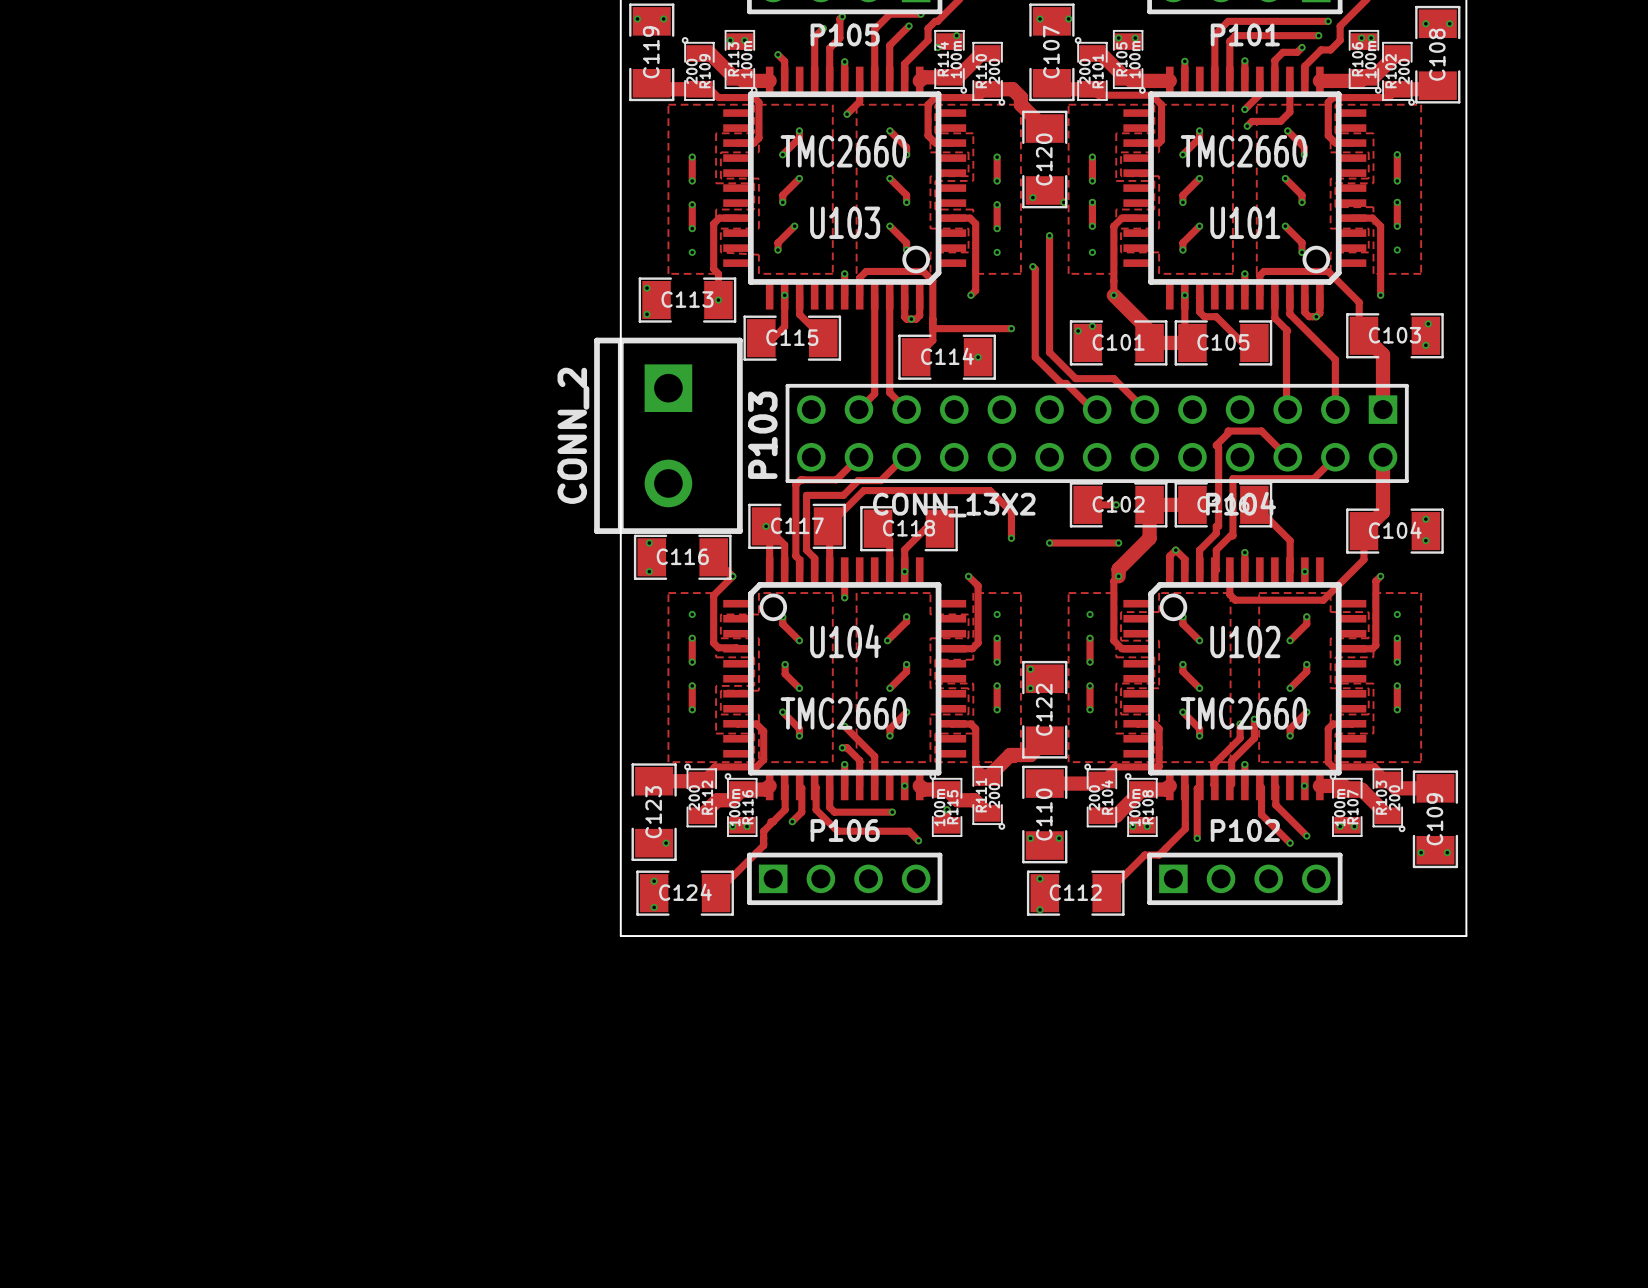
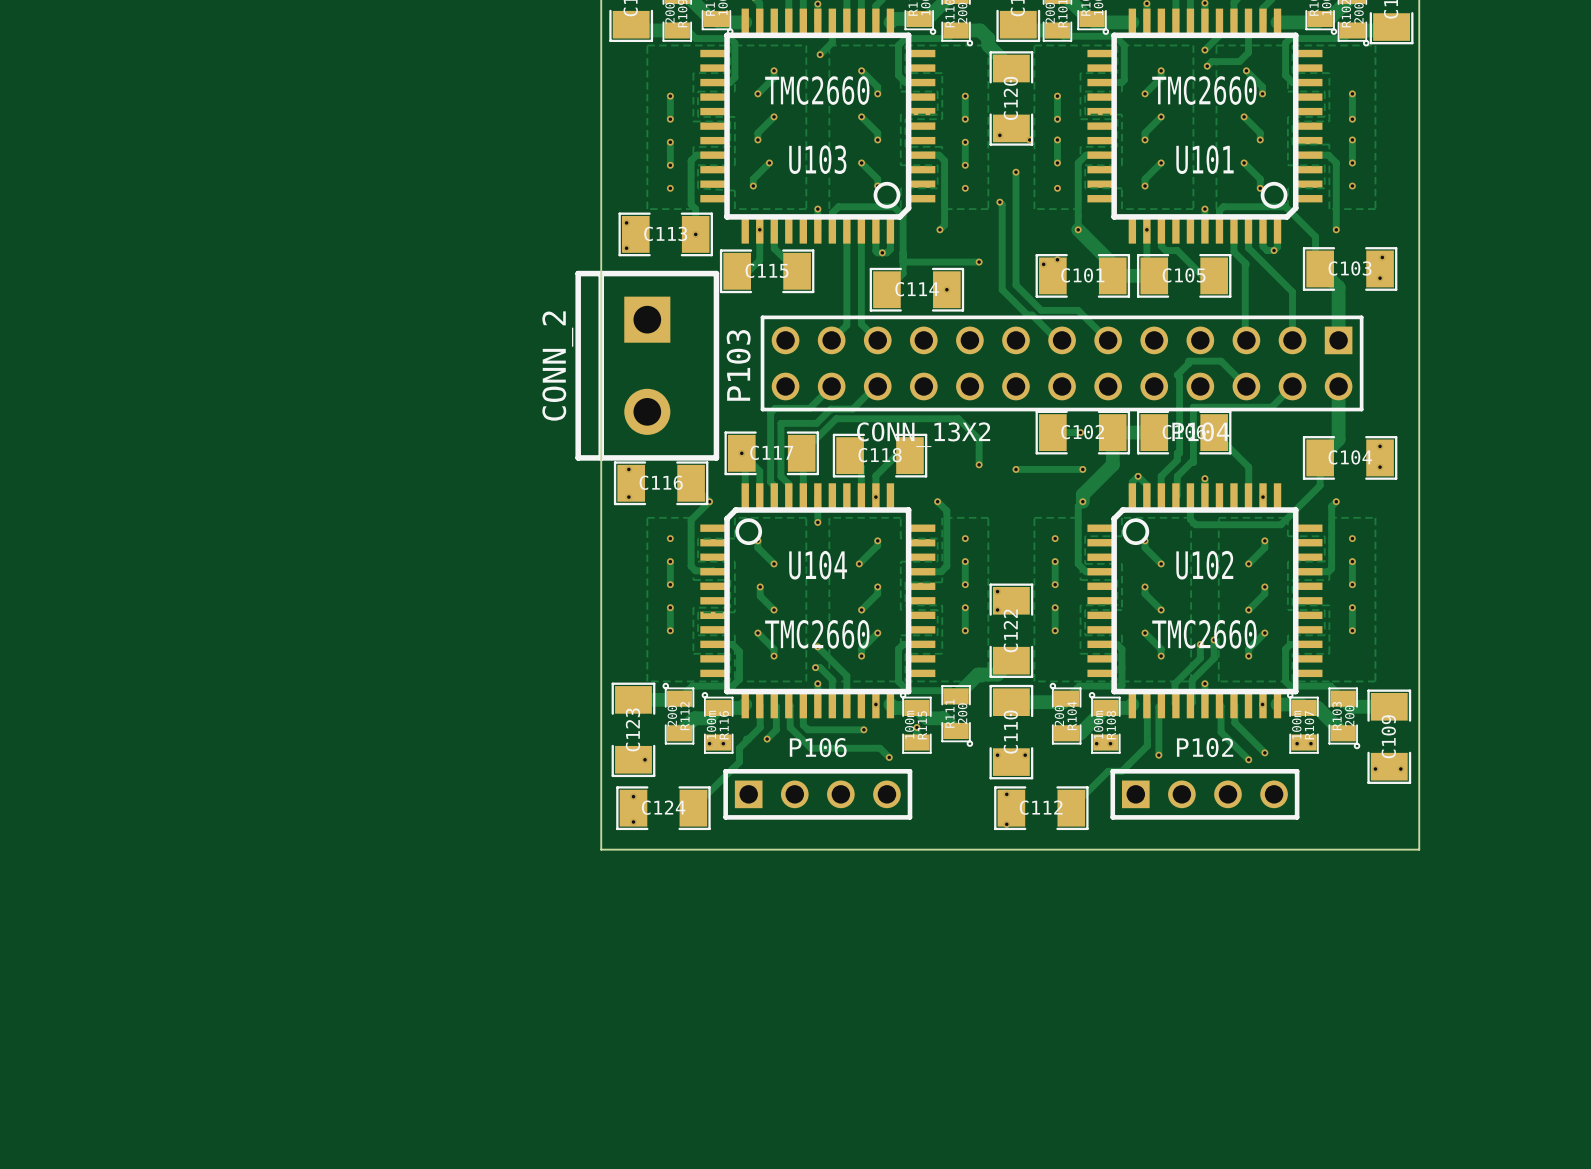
track: (952, 724) (970, 724) (975, 728) (975, 765) (981, 771) -> (921, 644) (903, 644) (898, 649) (898, 681) (907, 690) (950, 690)

